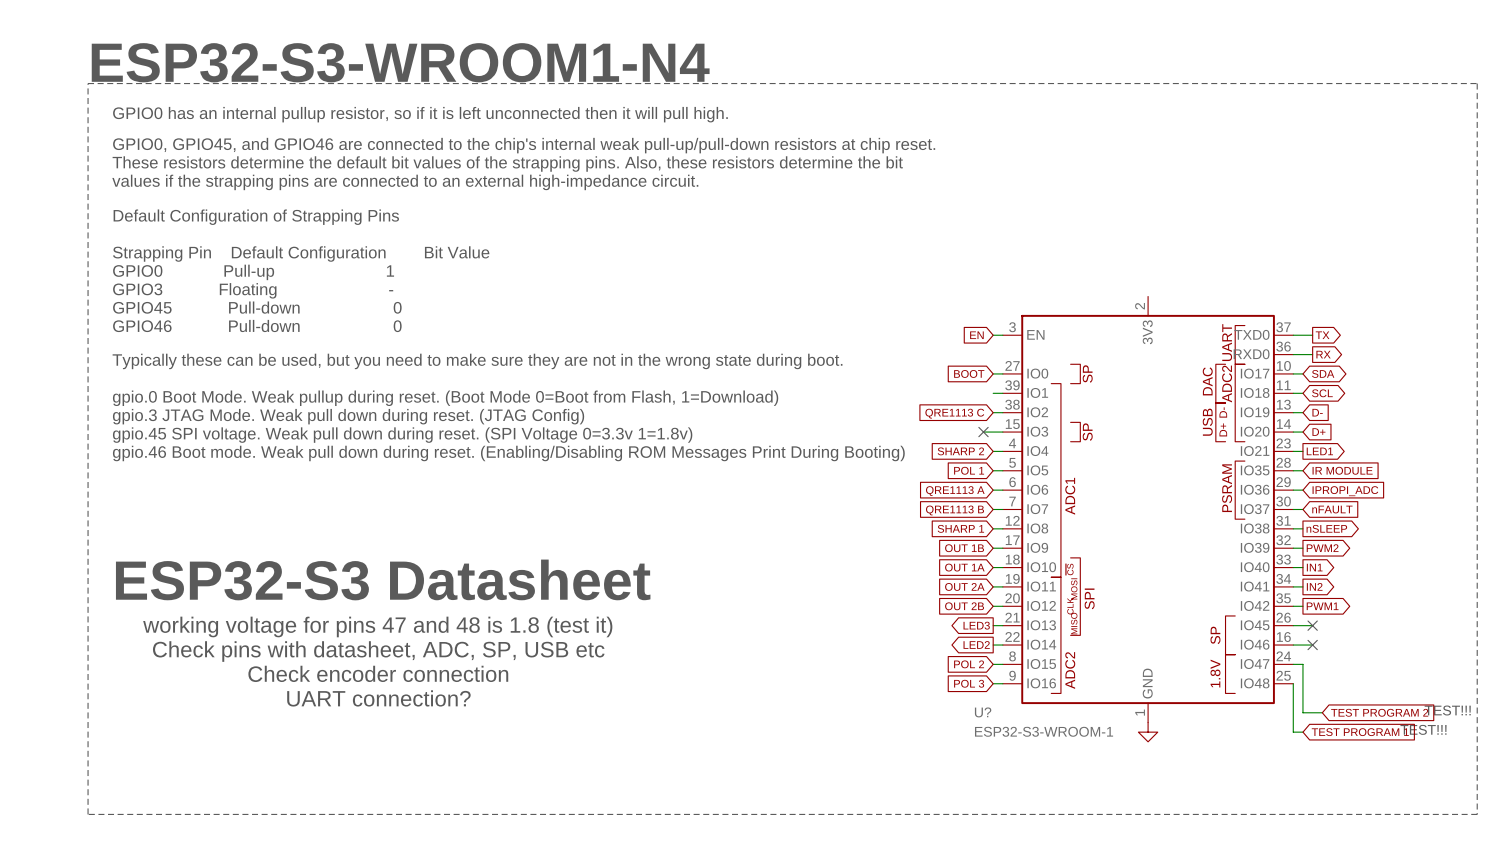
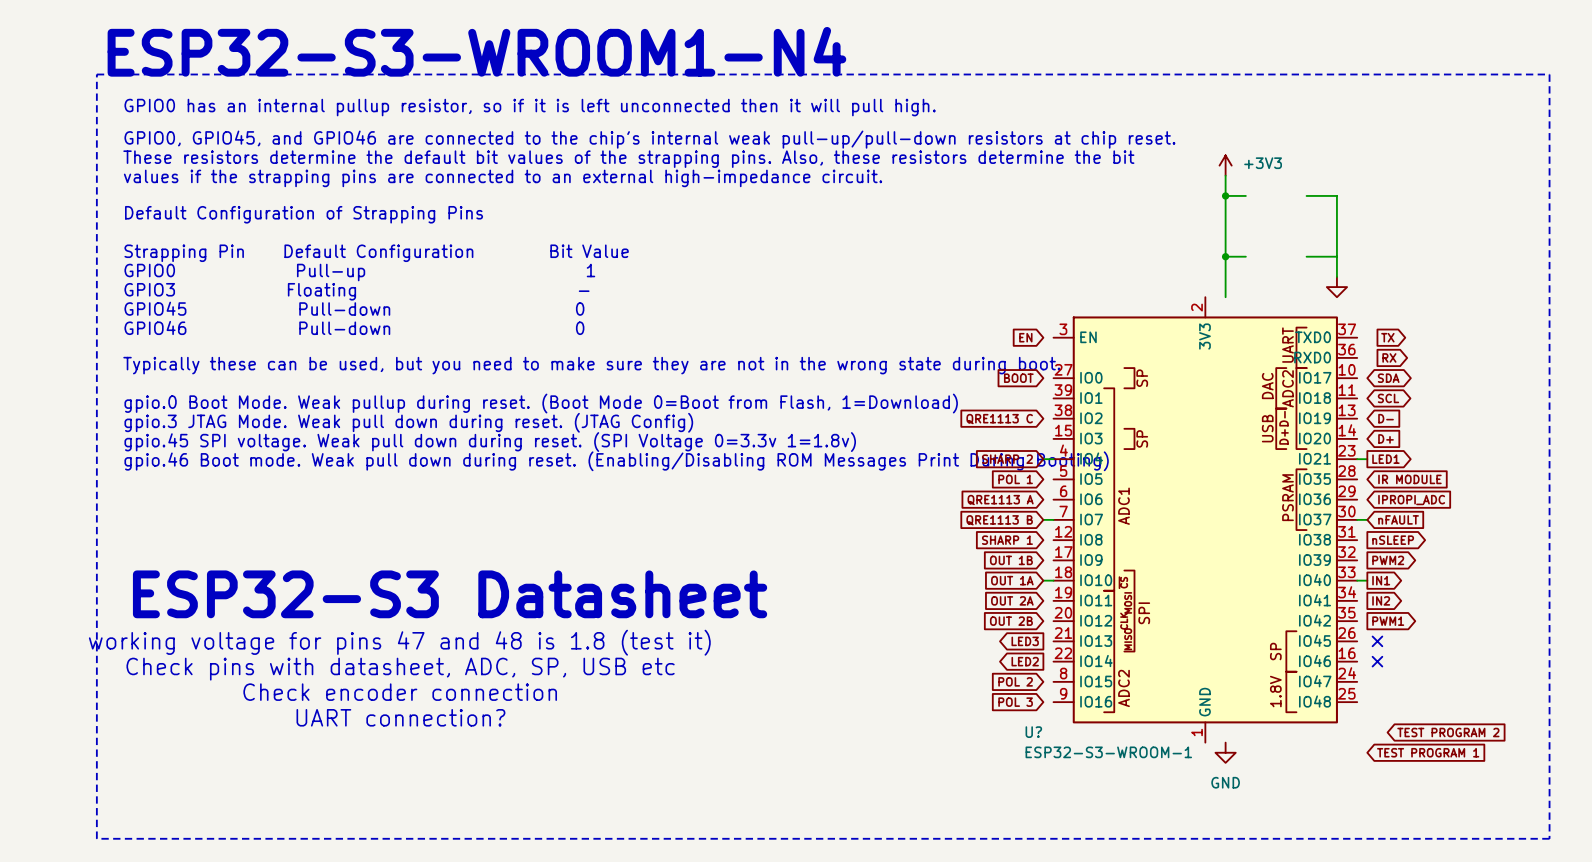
power symbol: none -> +3V3 (1225, 165)
wire: none -> (1225, 175) (1225, 297)
wire: none -> (1225, 195) (1245, 195)
junction: none -> (1225, 195)
wire: none -> (1306, 195) (1336, 195) (1336, 276)
junction: none -> (1225, 256)
wire: none -> (1306, 256) (1336, 256)
power symbol: none -> (1336, 287)
wire: (993, 335) (1002, 335) -> none
wire: (1293, 335) (1312, 335) -> (1225, 256) (1245, 256)
wire: (1293, 354) (1312, 354) -> none
wire: (993, 373) (1002, 373) -> none
wire: (1293, 373) (1302, 373) -> none
wire: (993, 393) (1002, 393) -> none
wire: (1293, 393) (1302, 393) -> none
wire: (993, 412) (1002, 412) -> none
wire: (1293, 412) (1302, 412) -> none
wire: (983, 432) (1002, 432) -> none
no-connect mark: (983, 432) -> none
wire: (1293, 432) (1302, 432) -> none
wire: (993, 470) (1002, 470) -> none
wire: (1293, 470) (1302, 470) -> none
wire: (993, 490) (1002, 490) -> none
wire: (1293, 490) (1302, 490) -> none
wire: (993, 528) (1002, 528) -> none
wire: (1293, 528) (1302, 528) -> none
wire: (993, 548) (1002, 548) -> none
wire: (1293, 548) (1302, 548) -> none
wire: (993, 586) (1002, 586) -> none
wire: (1293, 586) (1302, 586) -> none
wire: (993, 606) (1002, 606) -> none
wire: (1293, 606) (1302, 606) -> none
wire: (993, 625) (1002, 625) -> none
wire: (1293, 625) (1312, 625) -> none
wire: (993, 645) (1002, 645) -> none
wire: (1293, 645) (1312, 645) -> none
wire: (993, 664) (1002, 664) -> none
wire: (1293, 664) (1302, 664) (1302, 712) (1322, 712) -> none
wire: (993, 683) (1002, 683) -> none
wire: (1293, 683) (1293, 732) (1302, 732) -> none
text: TEST!!! (1447, 710) -> none
text: TEST!!! (1423, 729) -> none
power symbol: (1148, 732) -> none
power symbol: none -> GND (1225, 752)

